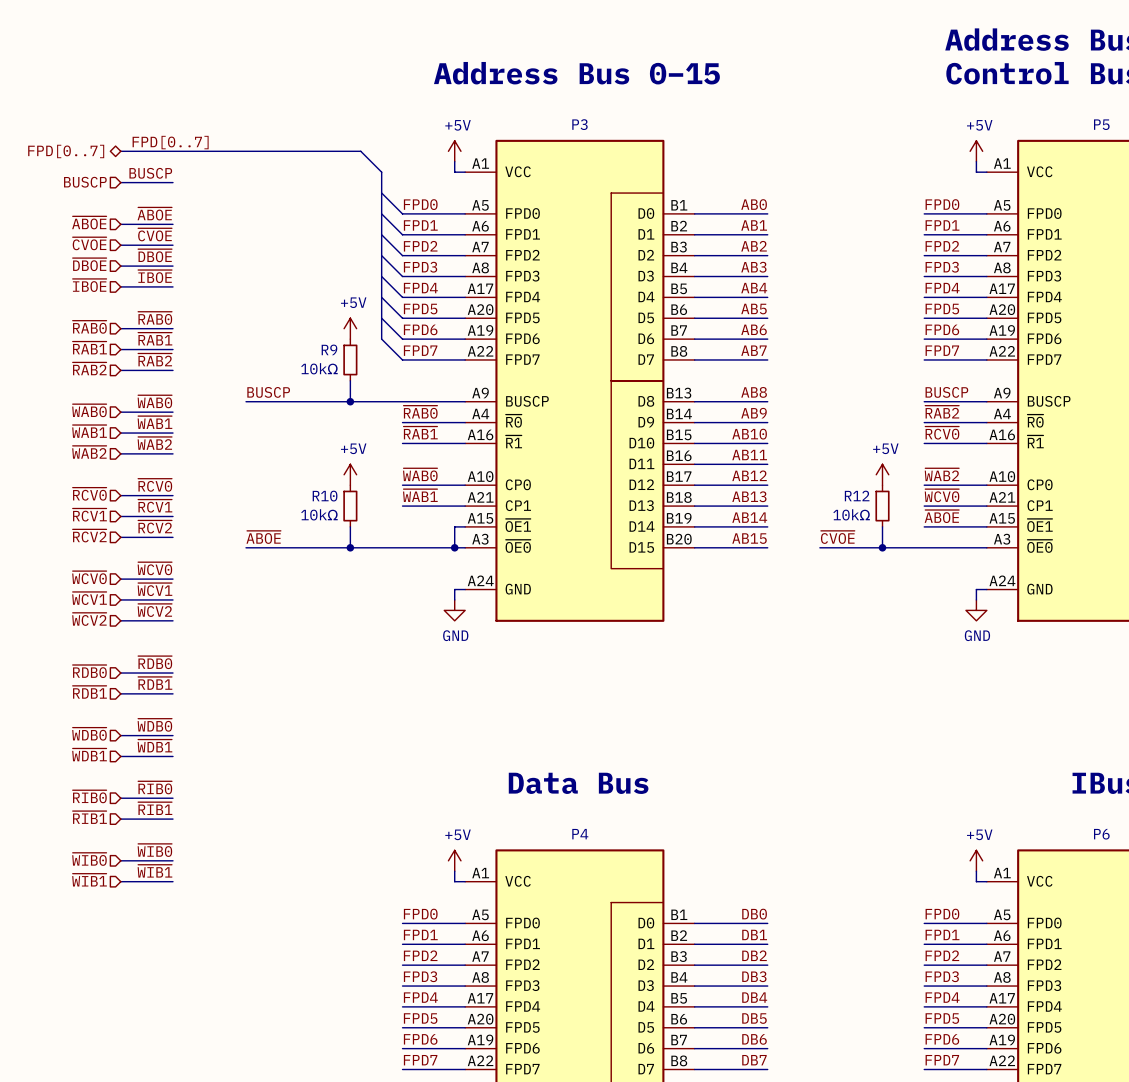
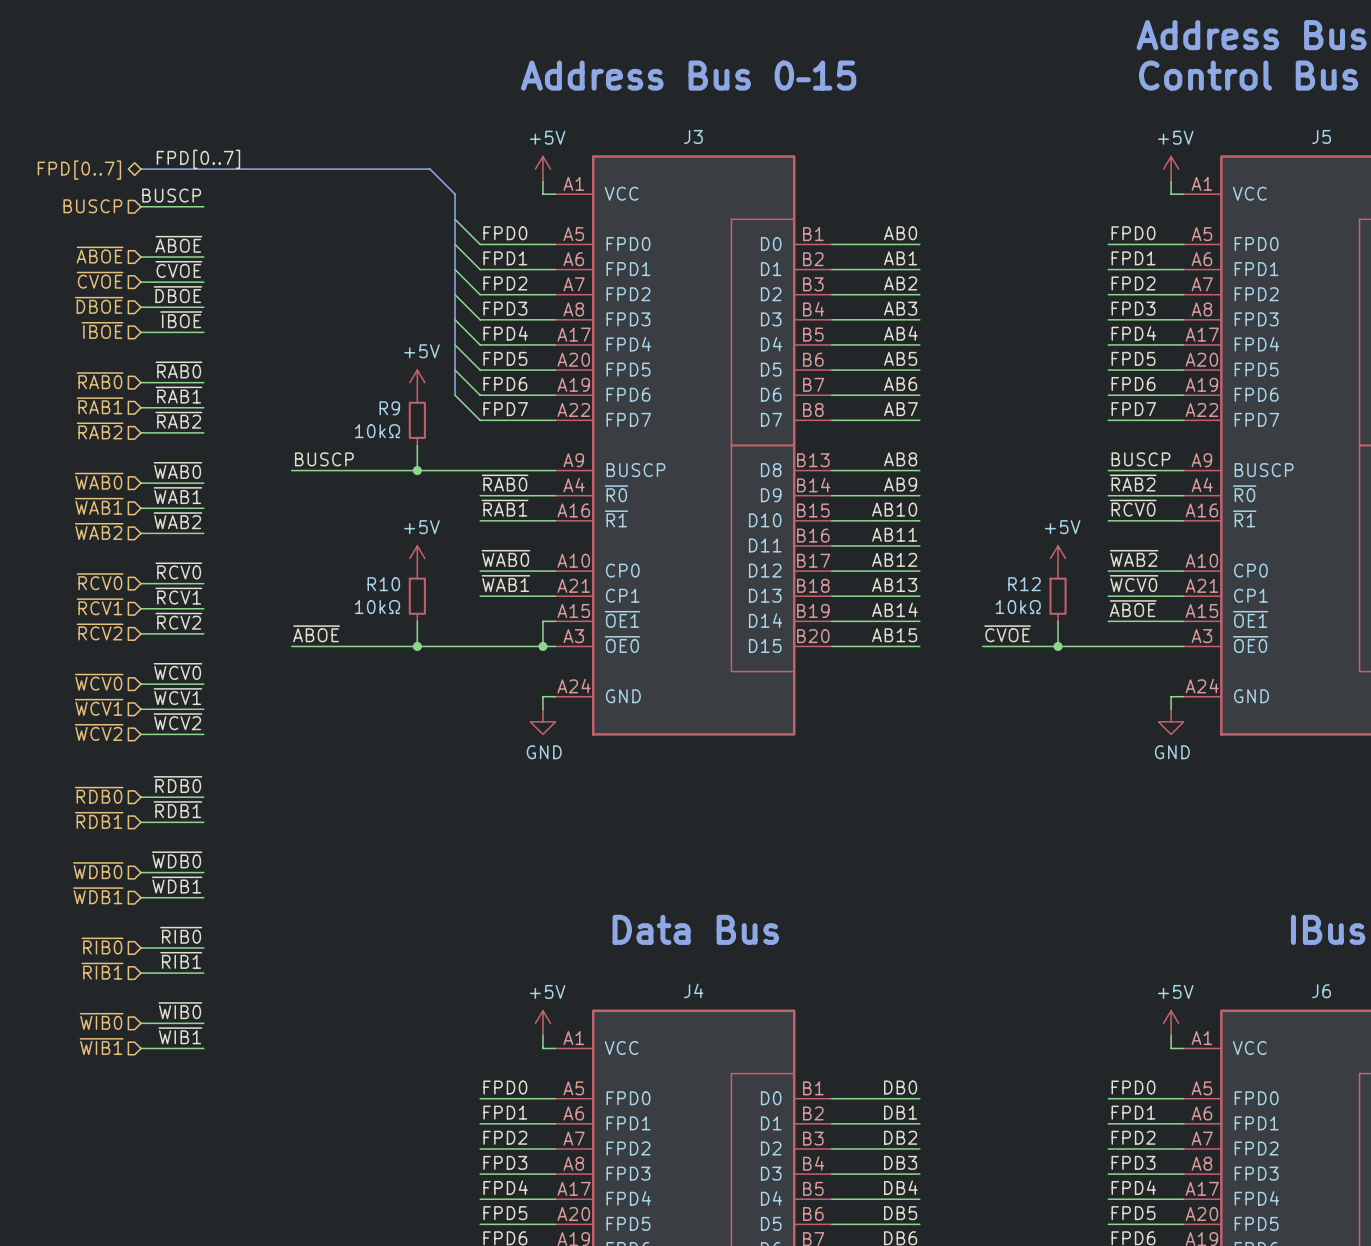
P3 name: P3 (579, 124) -> J3 (693, 136)
P5 name: P5 (1101, 124) -> J5 (1321, 136)
P4 name: P4 (580, 834) -> J4 (693, 990)
P6 name: P6 (1101, 834) -> J6 (1321, 991)

